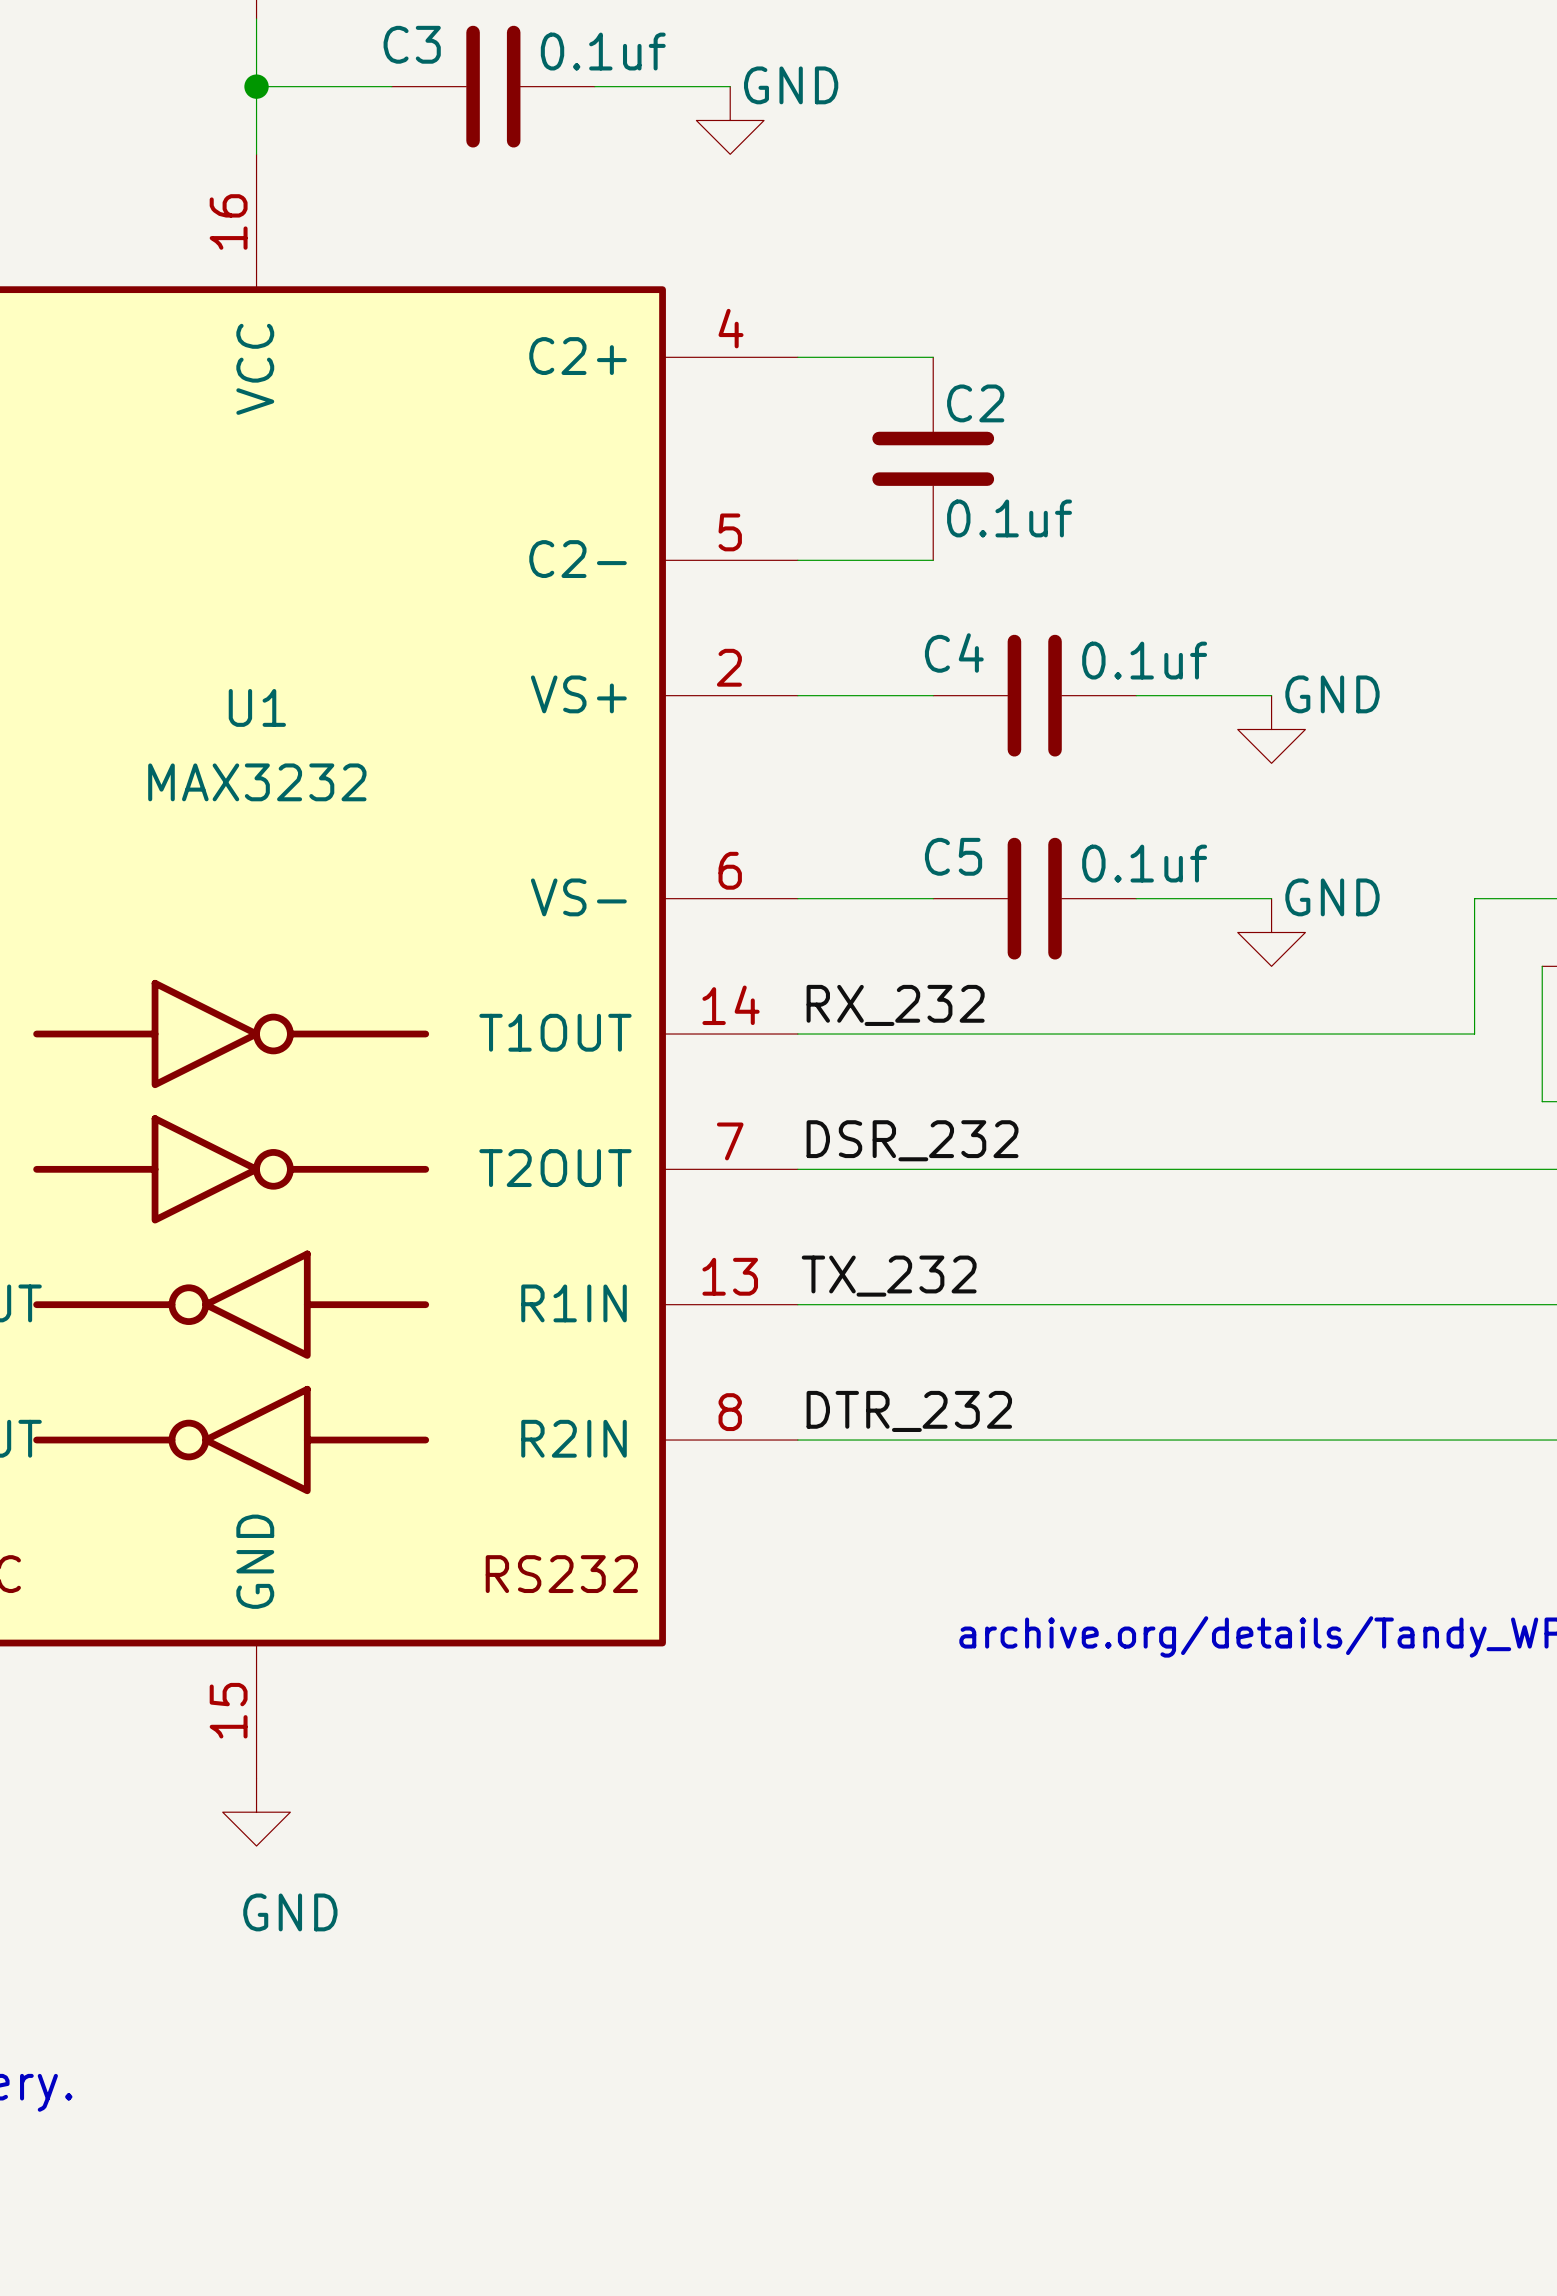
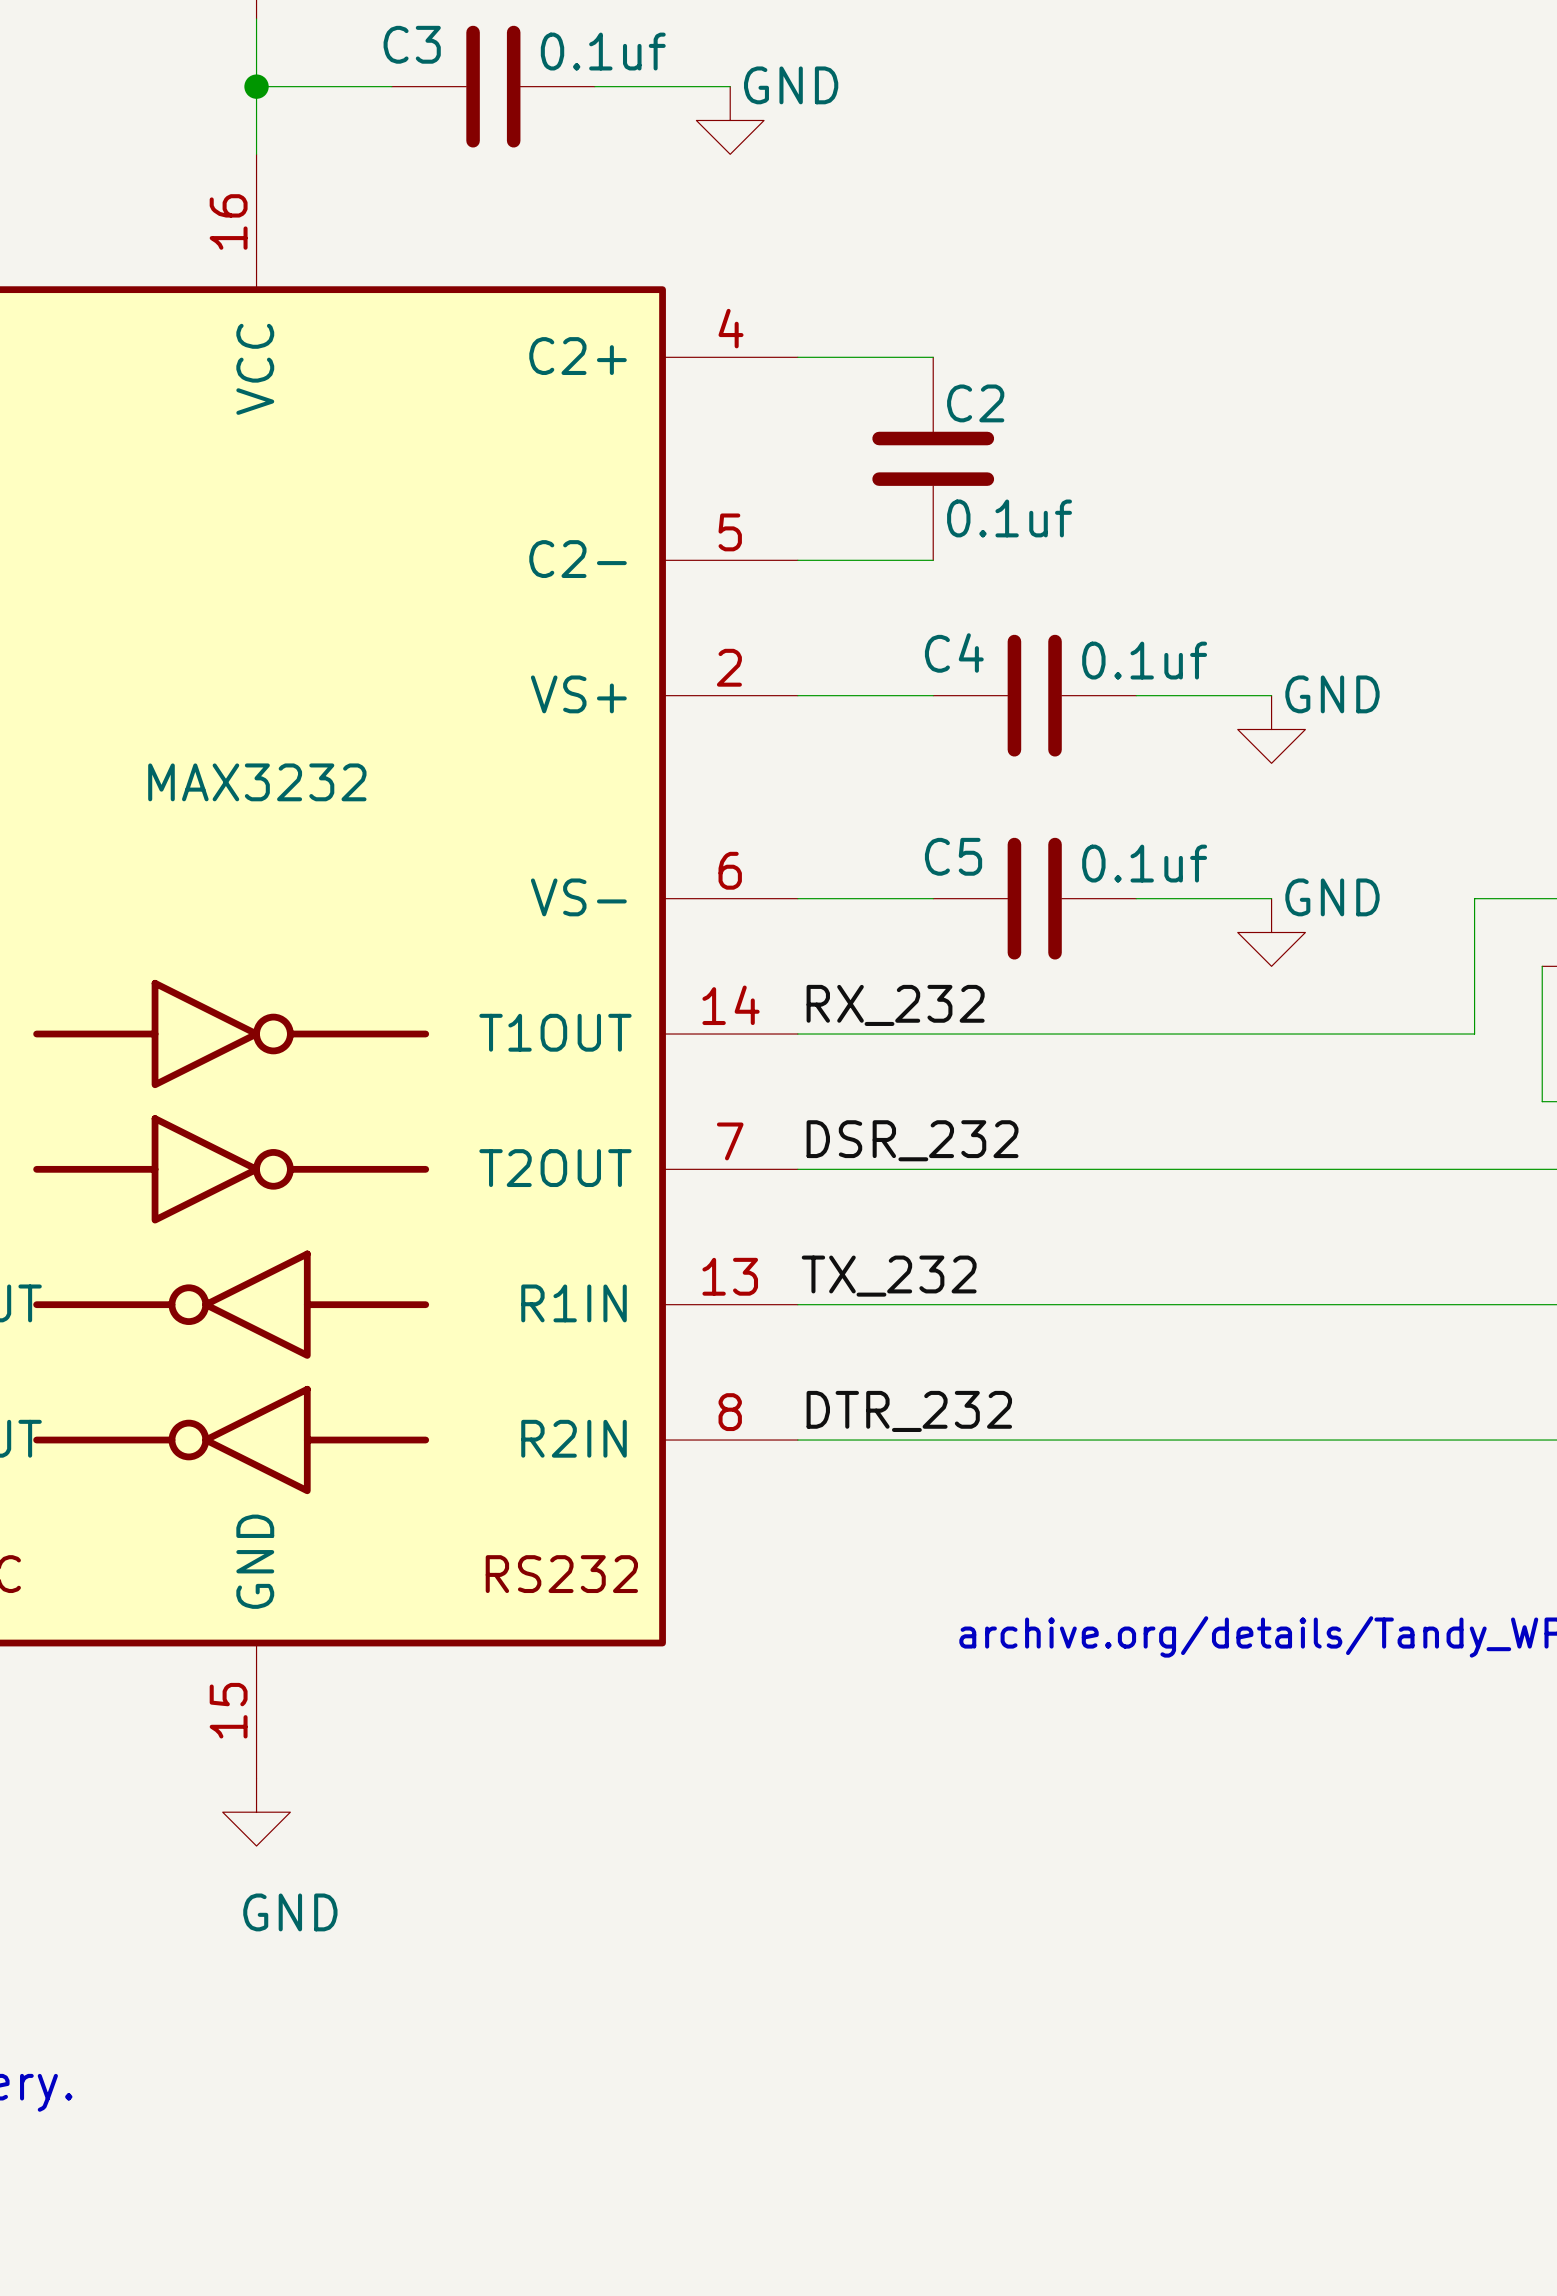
U1 name: U1 (257, 707) -> none

